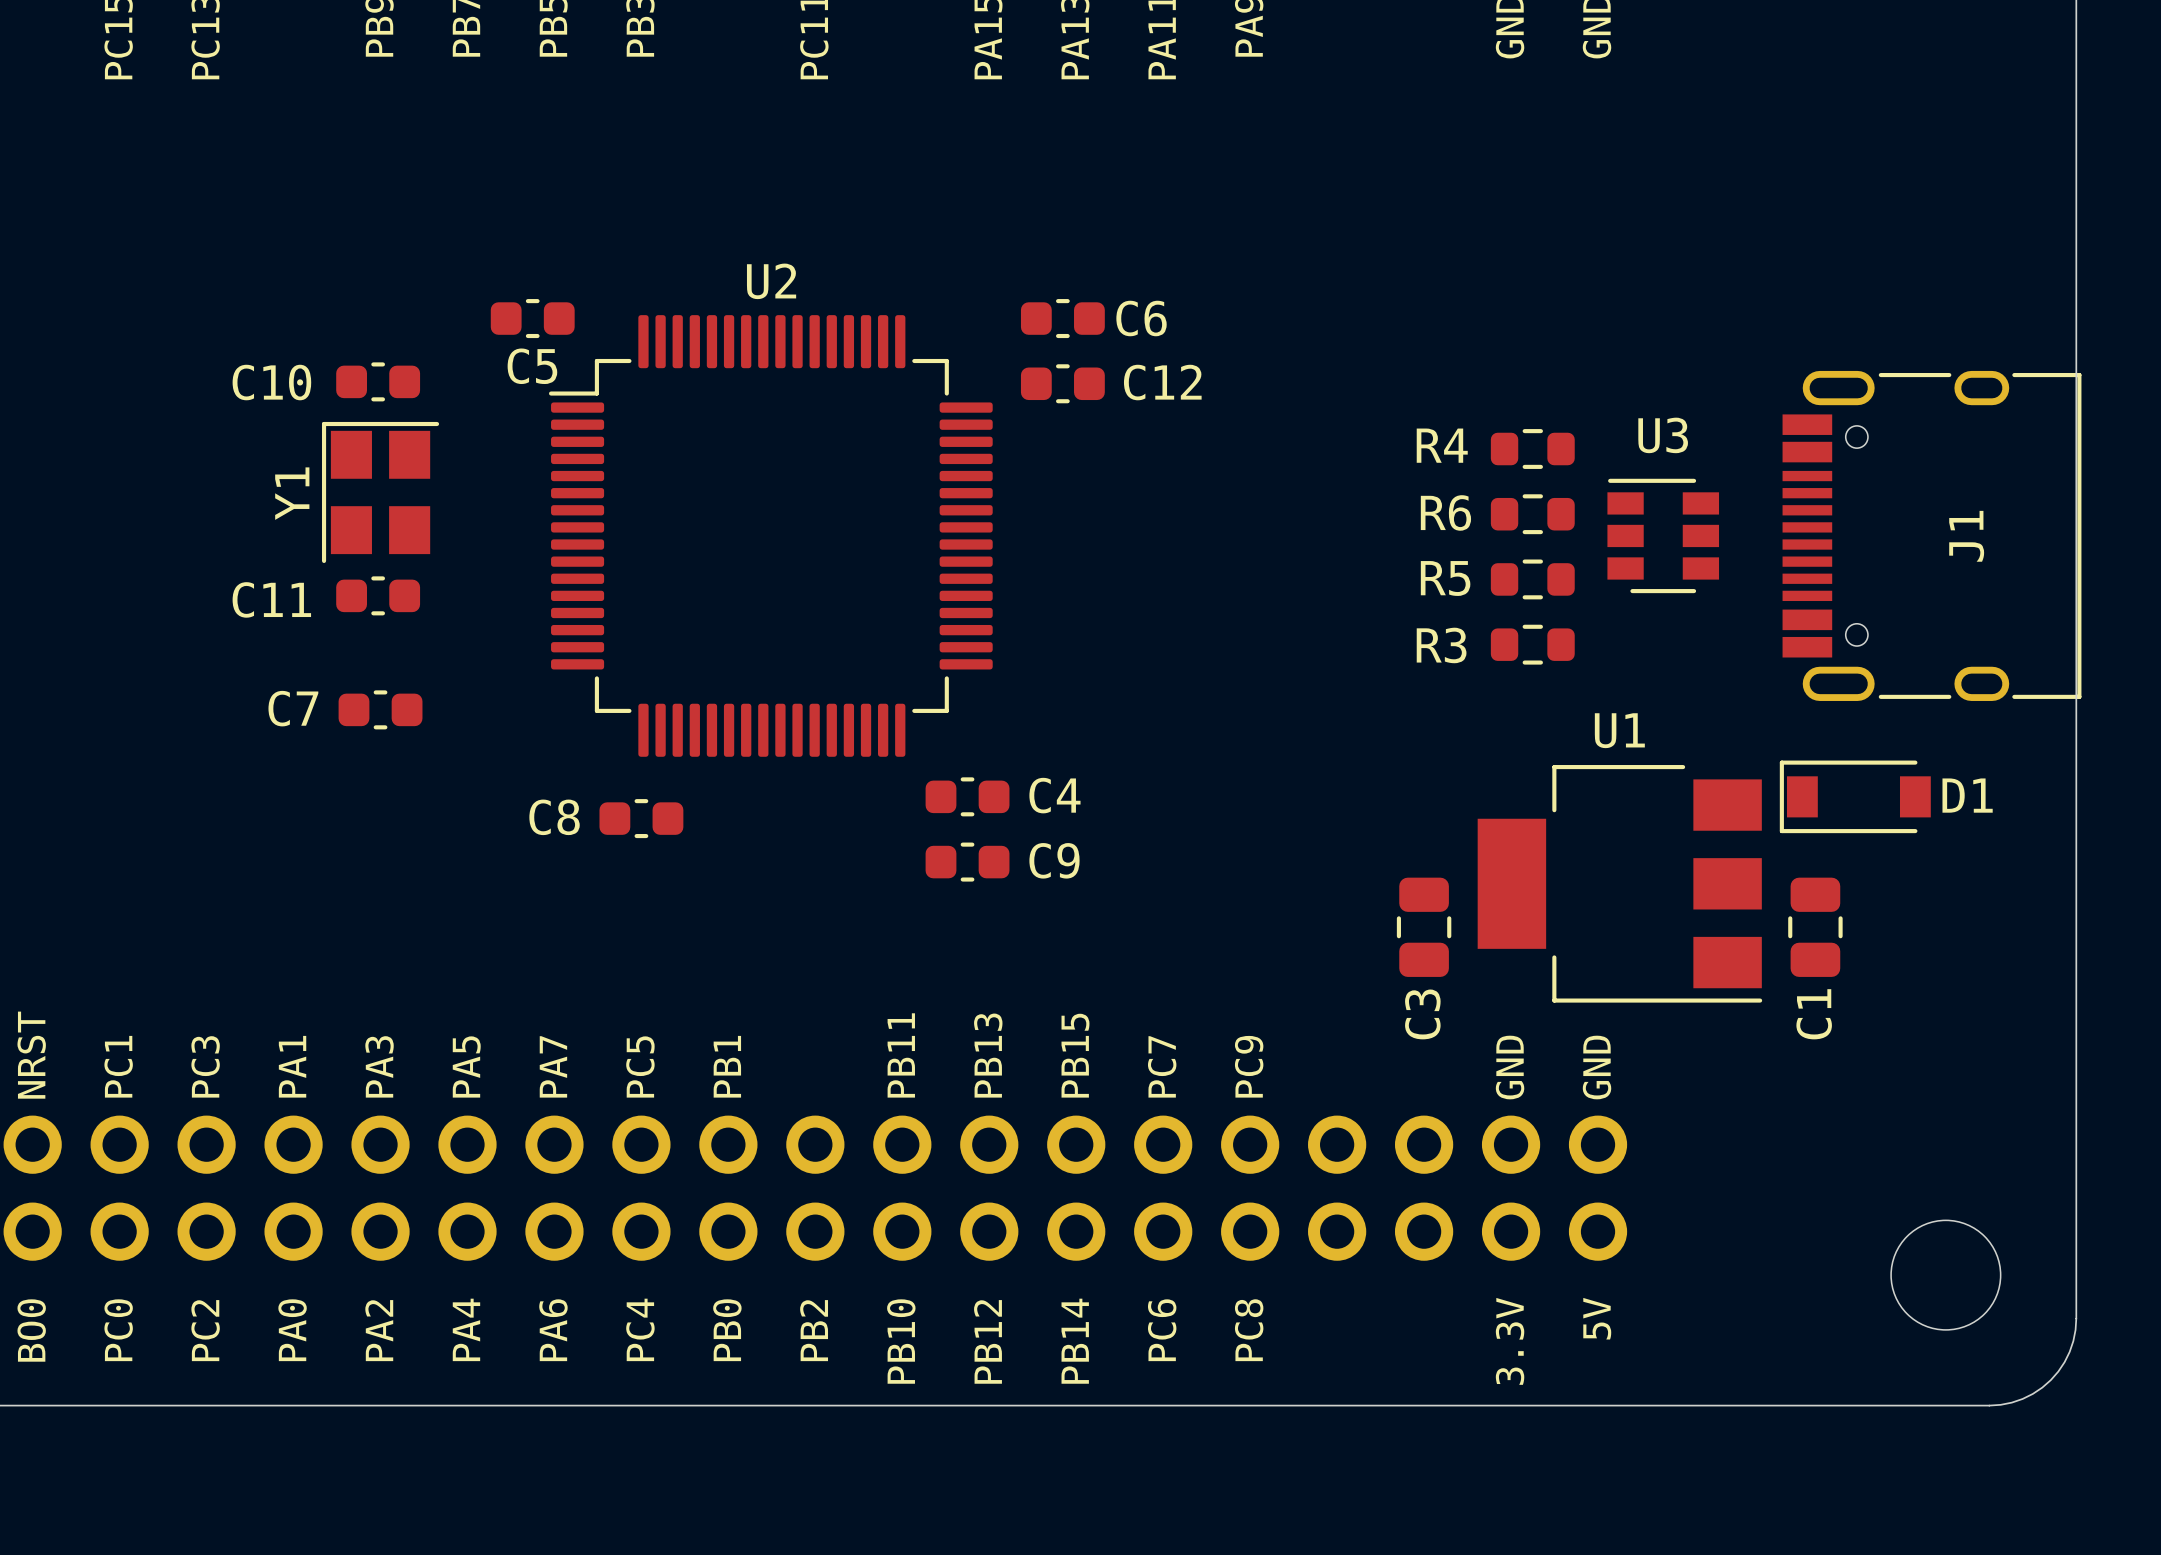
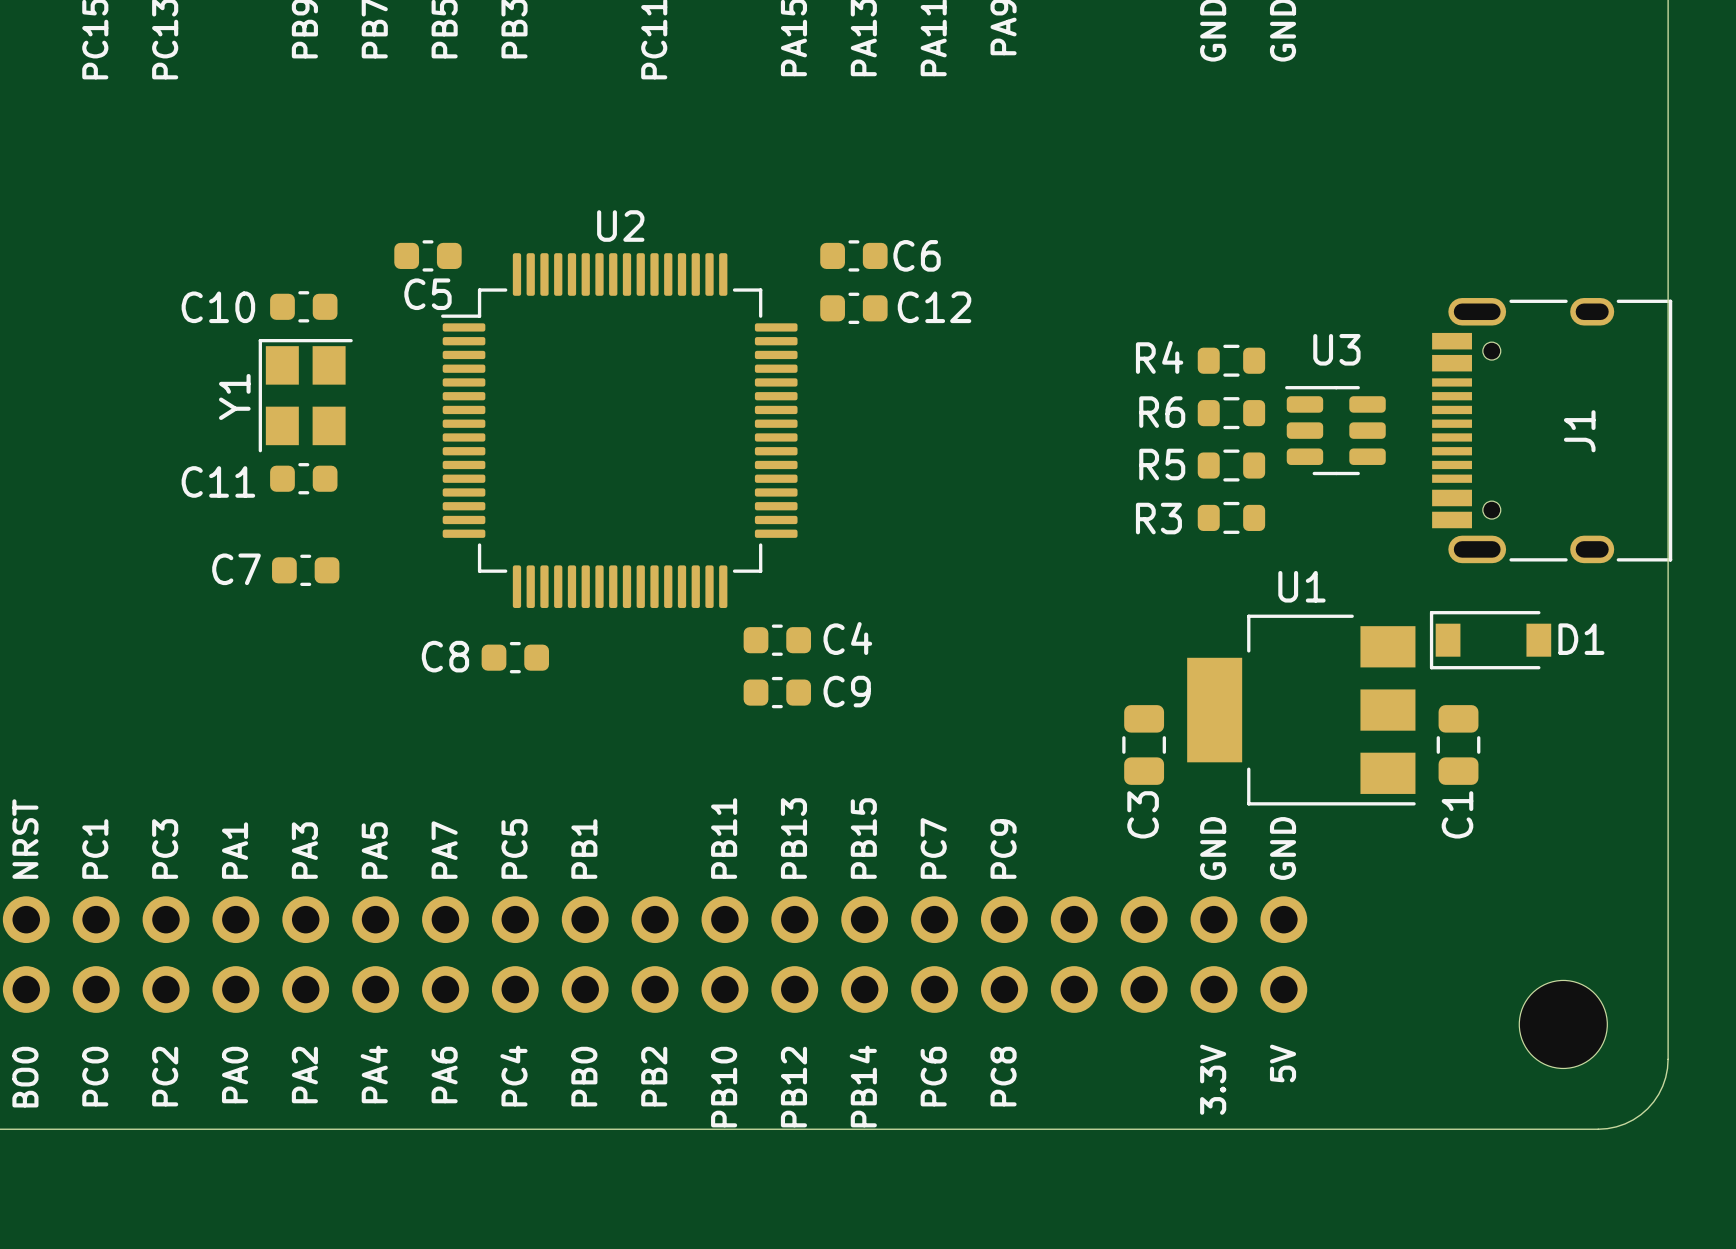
U3 footprint: [1607, 478, 1720, 594] -> [1285, 386, 1386, 476]

